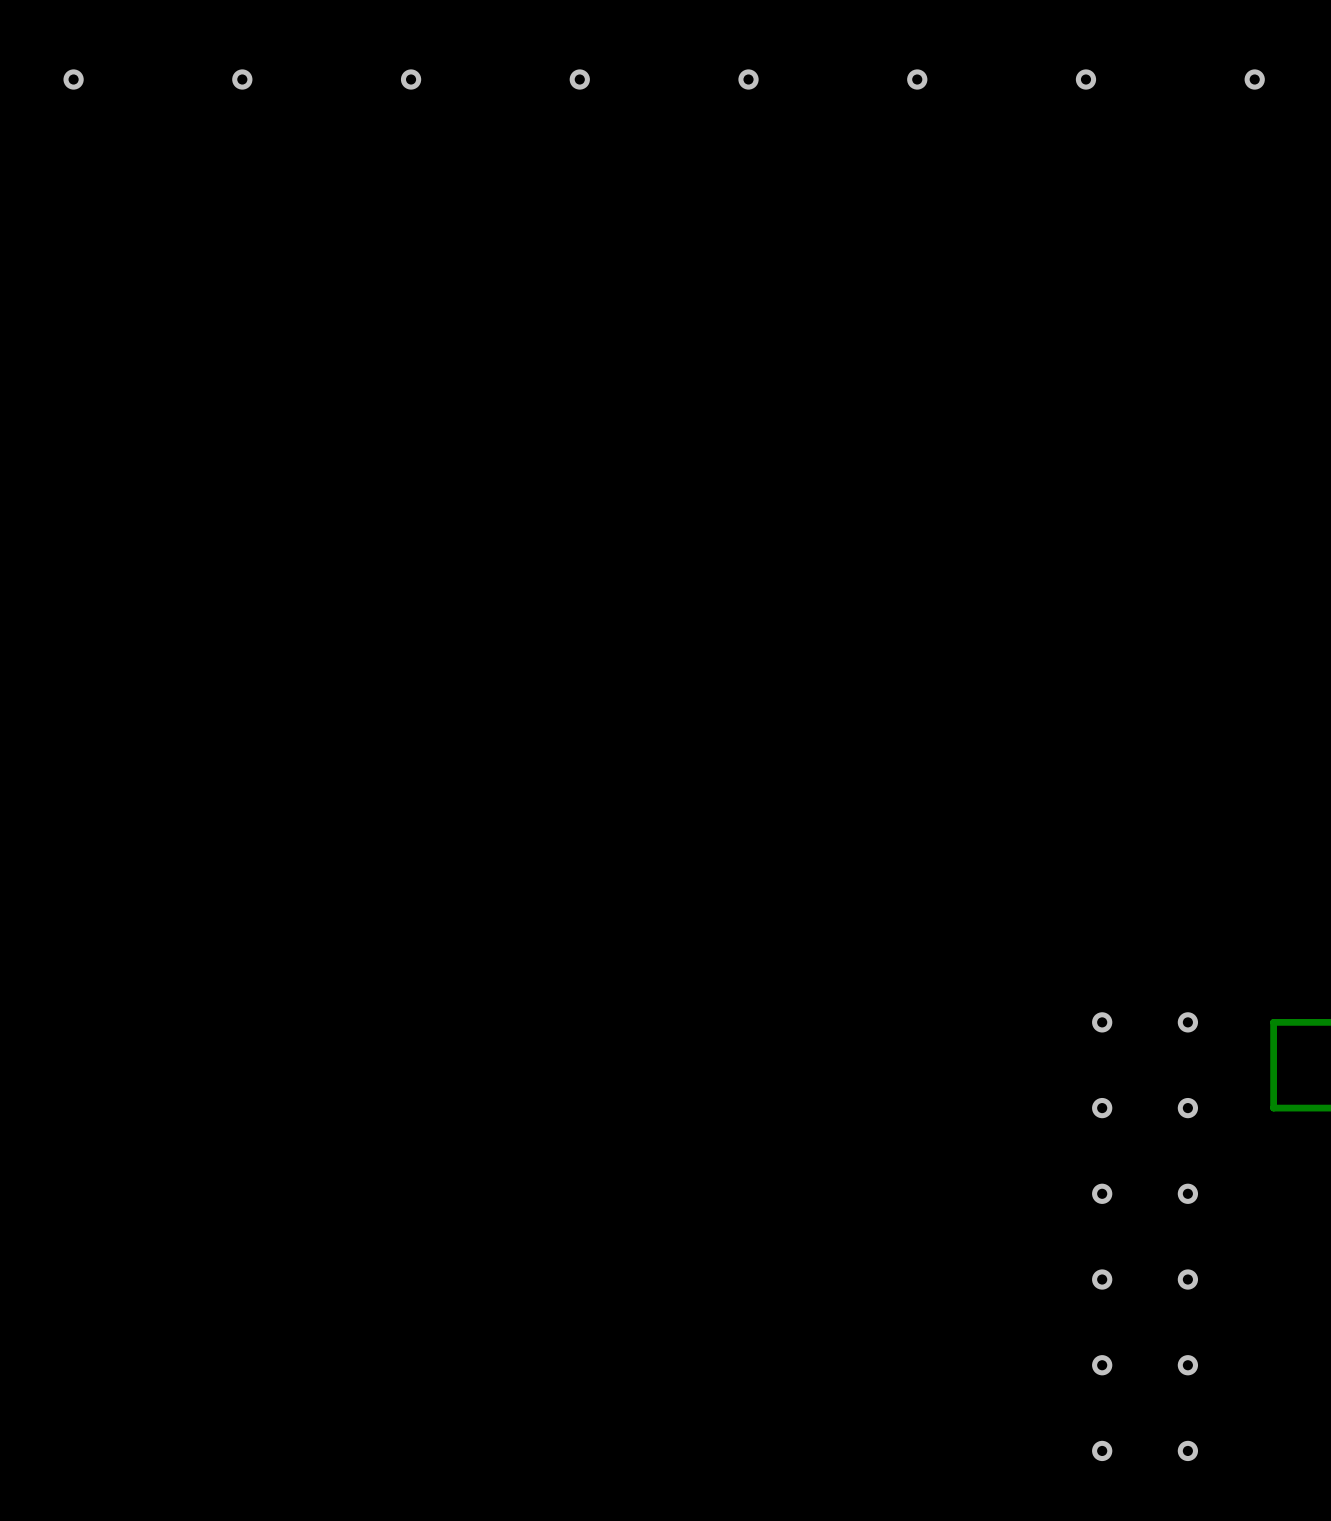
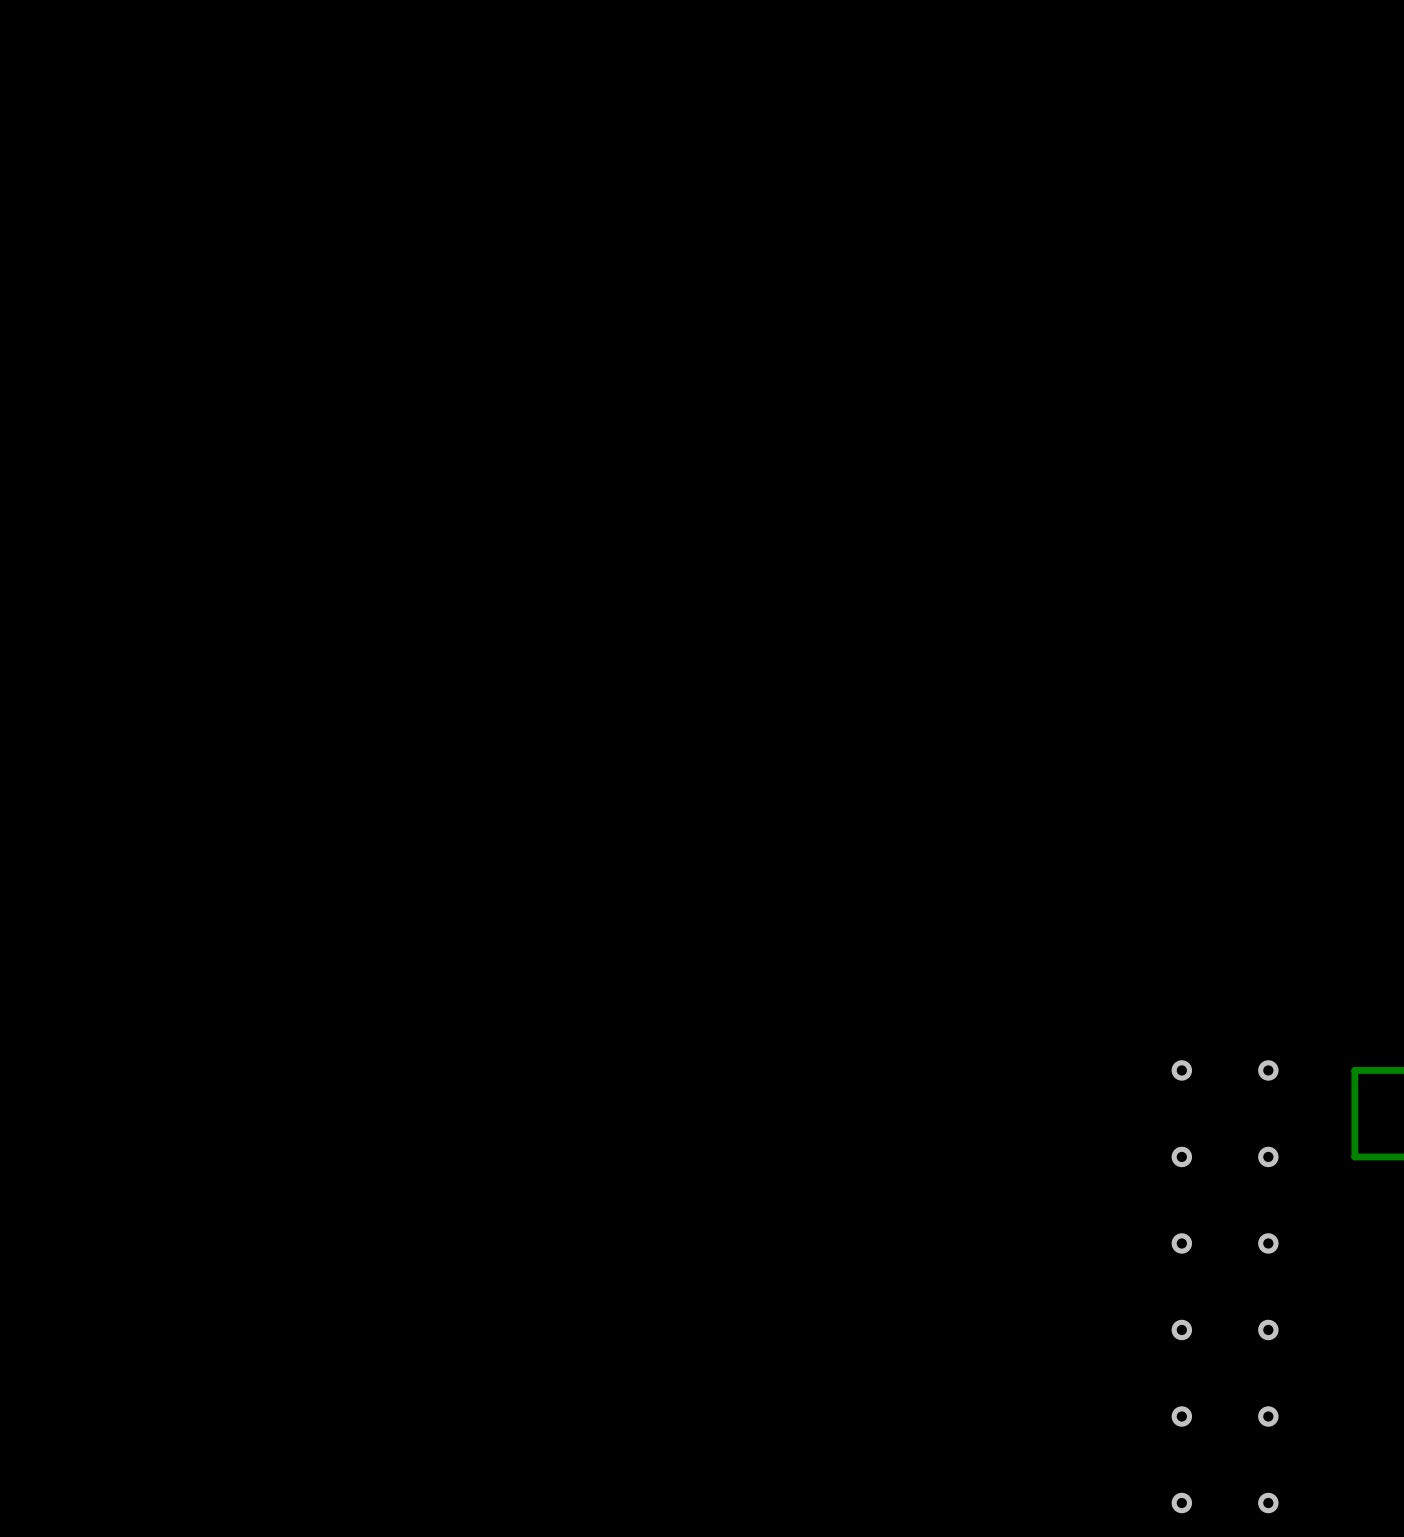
via: (73, 79) -> none
via: (242, 79) -> none
via: (411, 79) -> none
via: (579, 79) -> none
via: (748, 79) -> none
via: (917, 79) -> none
via: (1085, 79) -> none
via: (1254, 79) -> none

